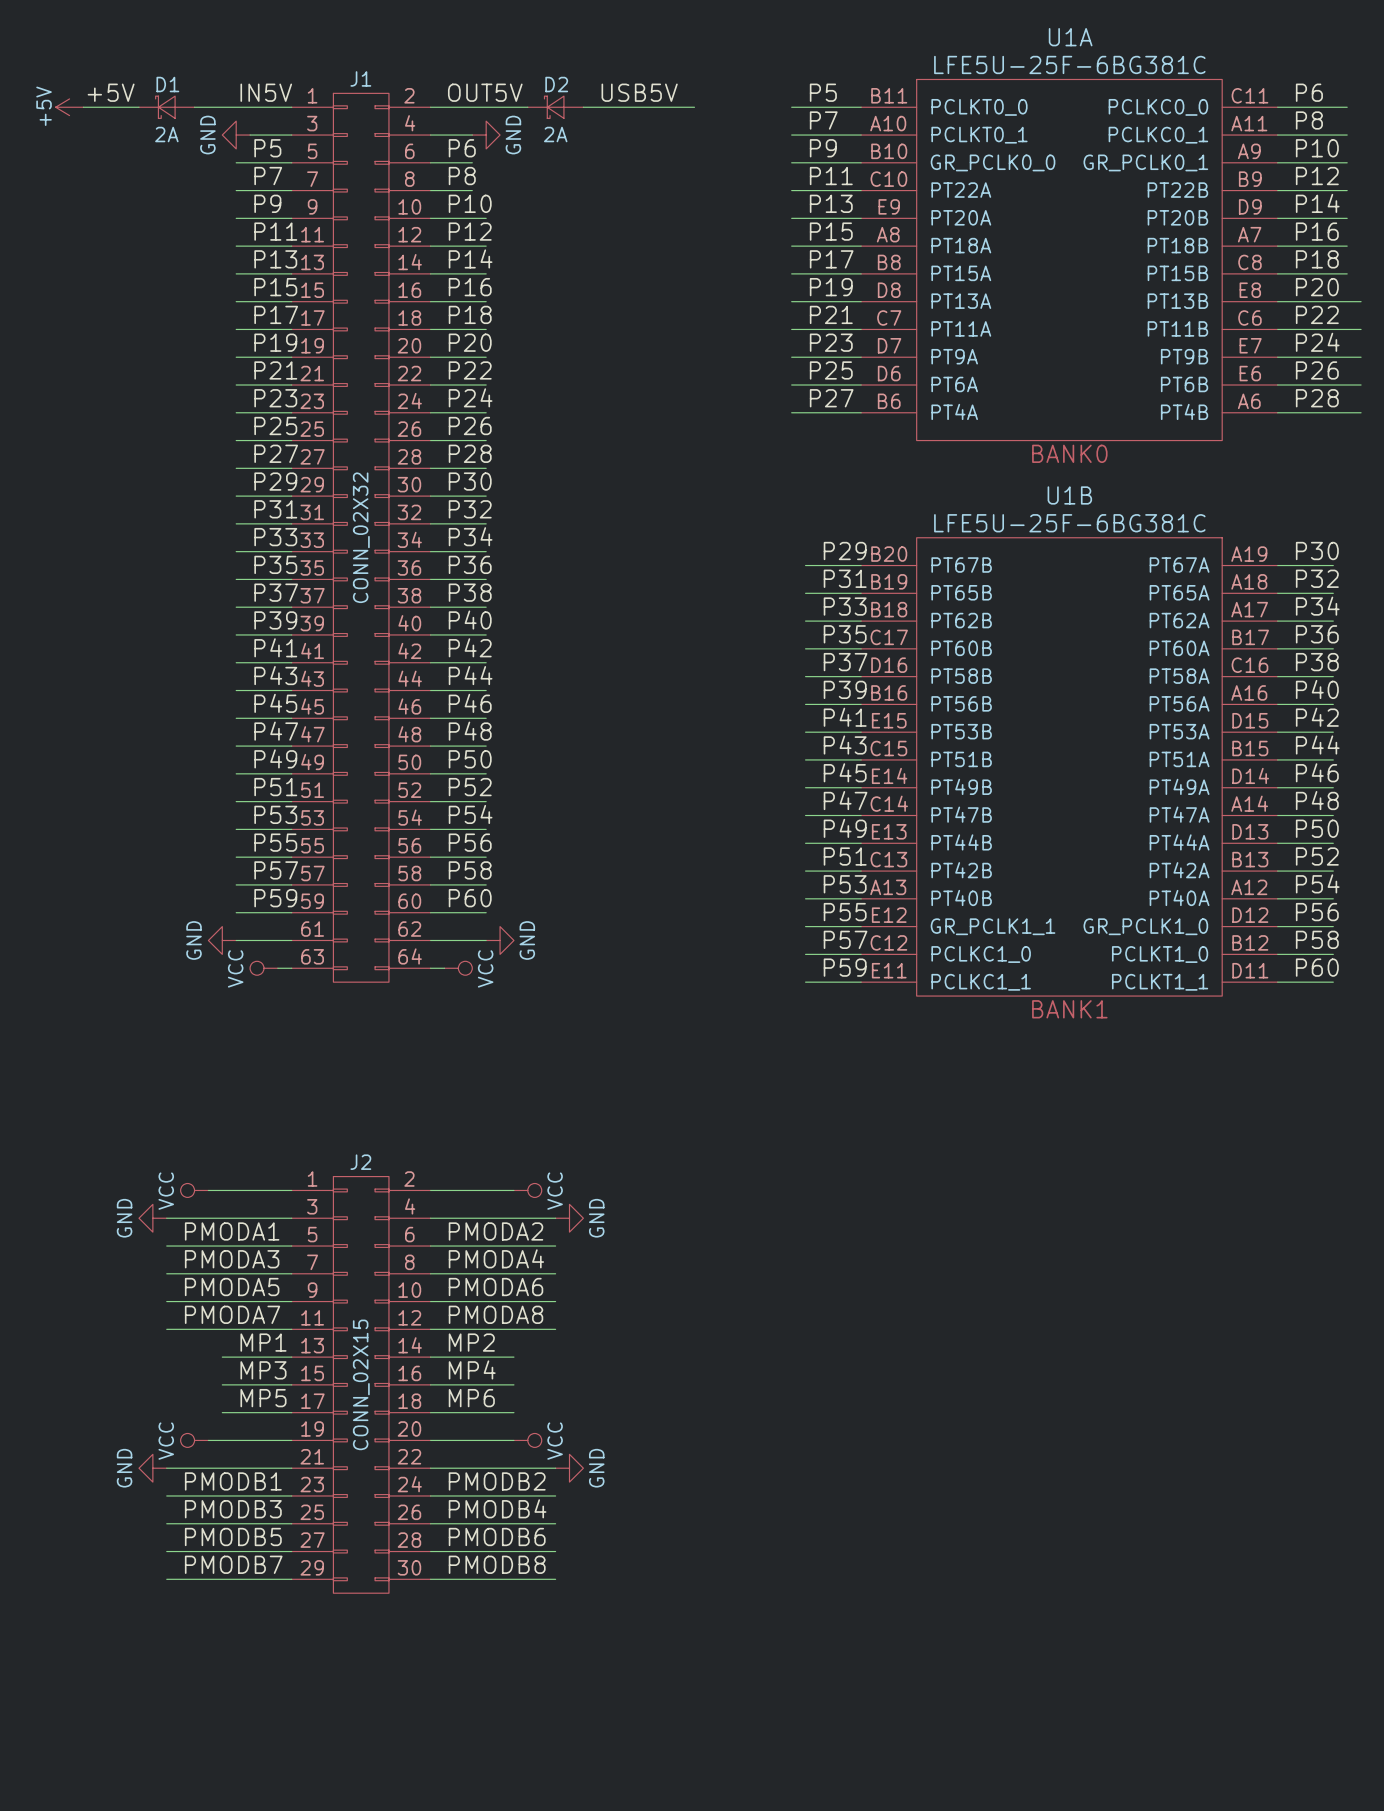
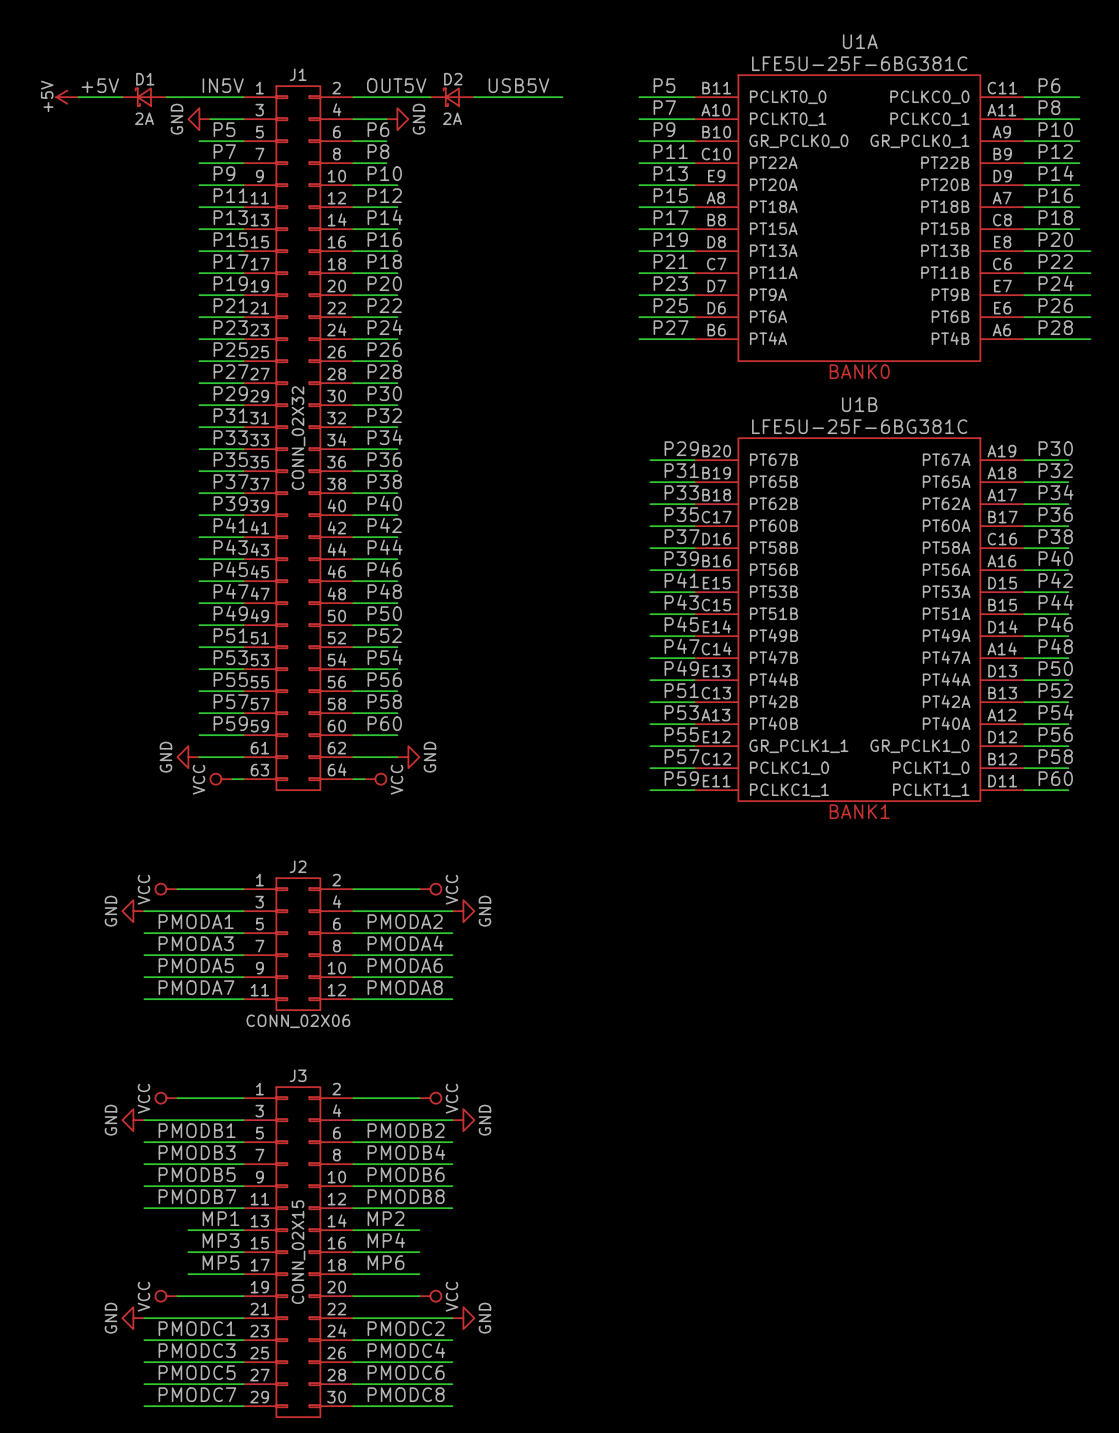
wire: none -> (177, 889) (243, 889)
wire: none -> (353, 889) (419, 889)
wire: none -> (144, 911) (243, 911)
wire: none -> (353, 911) (452, 911)
label: none -> PMODA1 (196, 921)
label: none -> PMODA2 (405, 921)
wire: none -> (144, 933) (243, 933)
J2 name position: J2 (360, 1162) -> J2 (298, 866)
wire: none -> (353, 933) (452, 933)
J2 symbol: [291, 1176, 431, 1594] -> [243, 878, 354, 1011]
wire: none -> (144, 955) (177, 955)
power symbol position: VCC (194, 1190) -> VCC (166, 889)
wire: none -> (419, 955) (452, 955)
power symbol position: VCC (527, 1190) -> VCC (430, 889)
power symbol position: GND (152, 1218) -> GND (133, 911)
power symbol position: GND (569, 1218) -> GND (463, 911)
label: PMODA1 (232, 1231) -> PMODA7 (196, 987)
label: PMODA2 (495, 1231) -> PMODA8 (405, 987)
label position: PMODA4 (496, 1258) -> PMODA4 (405, 943)
label position: PMODA3 (232, 1259) -> PMODA3 (196, 943)
wire: (166, 1273) (291, 1273) -> (144, 1164) (243, 1164)
wire: (430, 1273) (555, 1273) -> (353, 1164) (452, 1164)
label position: PMODA5 (232, 1287) -> PMODA5 (196, 965)
label position: PMODA6 (495, 1287) -> PMODA6 (405, 965)
wire: (166, 1301) (291, 1301) -> (144, 1186) (243, 1186)
wire: (430, 1301) (555, 1301) -> (353, 1186) (452, 1186)
label: PMODA7 (232, 1314) -> none
label: PMODA8 (495, 1314) -> none
wire: (166, 1329) (291, 1329) -> (144, 1208) (243, 1208)
wire: (430, 1329) (555, 1329) -> (353, 1208) (452, 1208)
label position: MP1 (263, 1342) -> MP1 (221, 1218)
label position: MP2 (471, 1342) -> MP2 (386, 1218)
wire: (222, 1357) (291, 1357) -> (188, 1230) (243, 1230)
wire: (430, 1357) (513, 1357) -> (353, 1230) (419, 1230)
label position: MP4 (472, 1369) -> MP4 (386, 1240)
label position: MP3 (263, 1370) -> MP3 (221, 1240)
wire: none -> (177, 1098) (243, 1098)
wire: none -> (353, 1098) (419, 1098)
wire: (222, 1384) (291, 1384) -> (188, 1252) (243, 1252)
J2 value: CONN_02X15 (361, 1384) -> CONN_02X06 (298, 1021)
wire: (430, 1384) (513, 1384) -> (353, 1252) (419, 1252)
wire: none -> (144, 1120) (243, 1120)
label position: MP5 (263, 1398) -> MP5 (221, 1262)
wire: none -> (353, 1120) (452, 1120)
label position: MP6 (471, 1398) -> MP6 (386, 1262)
wire: (222, 1412) (291, 1412) -> (188, 1274) (243, 1274)
wire: (430, 1412) (513, 1412) -> (353, 1274) (419, 1274)
wire: none -> (144, 1142) (243, 1142)
wire: none -> (353, 1142) (452, 1142)
power symbol position: VCC (194, 1440) -> VCC (166, 1098)
wire: (208, 1440) (291, 1440) -> (177, 1296) (243, 1296)
wire: (430, 1440) (513, 1440) -> (353, 1296) (419, 1296)
power symbol position: VCC (527, 1440) -> VCC (430, 1098)
power symbol position: GND (152, 1468) -> GND (133, 1120)
wire: (166, 1468) (291, 1468) -> (144, 1318) (243, 1318)
wire: (430, 1468) (555, 1468) -> (353, 1318) (452, 1318)
power symbol position: GND (569, 1468) -> GND (463, 1120)
label position: PMODB1 (233, 1481) -> PMODB1 (197, 1130)
label position: PMODB2 (497, 1481) -> PMODB2 (406, 1130)
wire: (166, 1495) (291, 1495) -> (144, 1340) (243, 1340)
wire: (430, 1495) (555, 1495) -> (353, 1340) (452, 1340)
label position: PMODB4 (497, 1508) -> PMODB4 (406, 1152)
label position: PMODB3 (233, 1509) -> PMODB3 (197, 1152)
wire: (166, 1523) (291, 1523) -> (144, 1362) (243, 1362)
wire: (430, 1523) (555, 1523) -> (353, 1362) (452, 1362)
label position: PMODB5 (233, 1536) -> PMODB5 (197, 1174)
label position: PMODB6 (497, 1536) -> PMODB6 (406, 1174)
wire: (166, 1551) (291, 1551) -> (144, 1384) (243, 1384)
wire: (430, 1551) (555, 1551) -> (353, 1384) (452, 1384)
label position: PMODB7 (233, 1564) -> PMODB7 (197, 1196)
label position: PMODB8 (497, 1564) -> PMODB8 (406, 1196)
J3: none -> CONN_02X15 (298, 1252)
wire: (166, 1579) (291, 1579) -> (144, 1406) (243, 1406)
wire: (430, 1579) (555, 1579) -> (353, 1406) (452, 1406)
power symbol: none -> VCC (166, 1296)
power symbol: none -> VCC (430, 1296)
power symbol: none -> GND (133, 1318)
power symbol: none -> GND (463, 1318)
label: none -> PMODC1 (197, 1328)
label: none -> PMODC2 (406, 1328)
label: none -> PMODC3 (197, 1350)
label: none -> PMODC4 (406, 1350)
label: none -> PMODC5 (197, 1372)
label: none -> PMODC6 (406, 1372)
label: none -> PMODC7 (197, 1394)
label: none -> PMODC8 (406, 1394)

